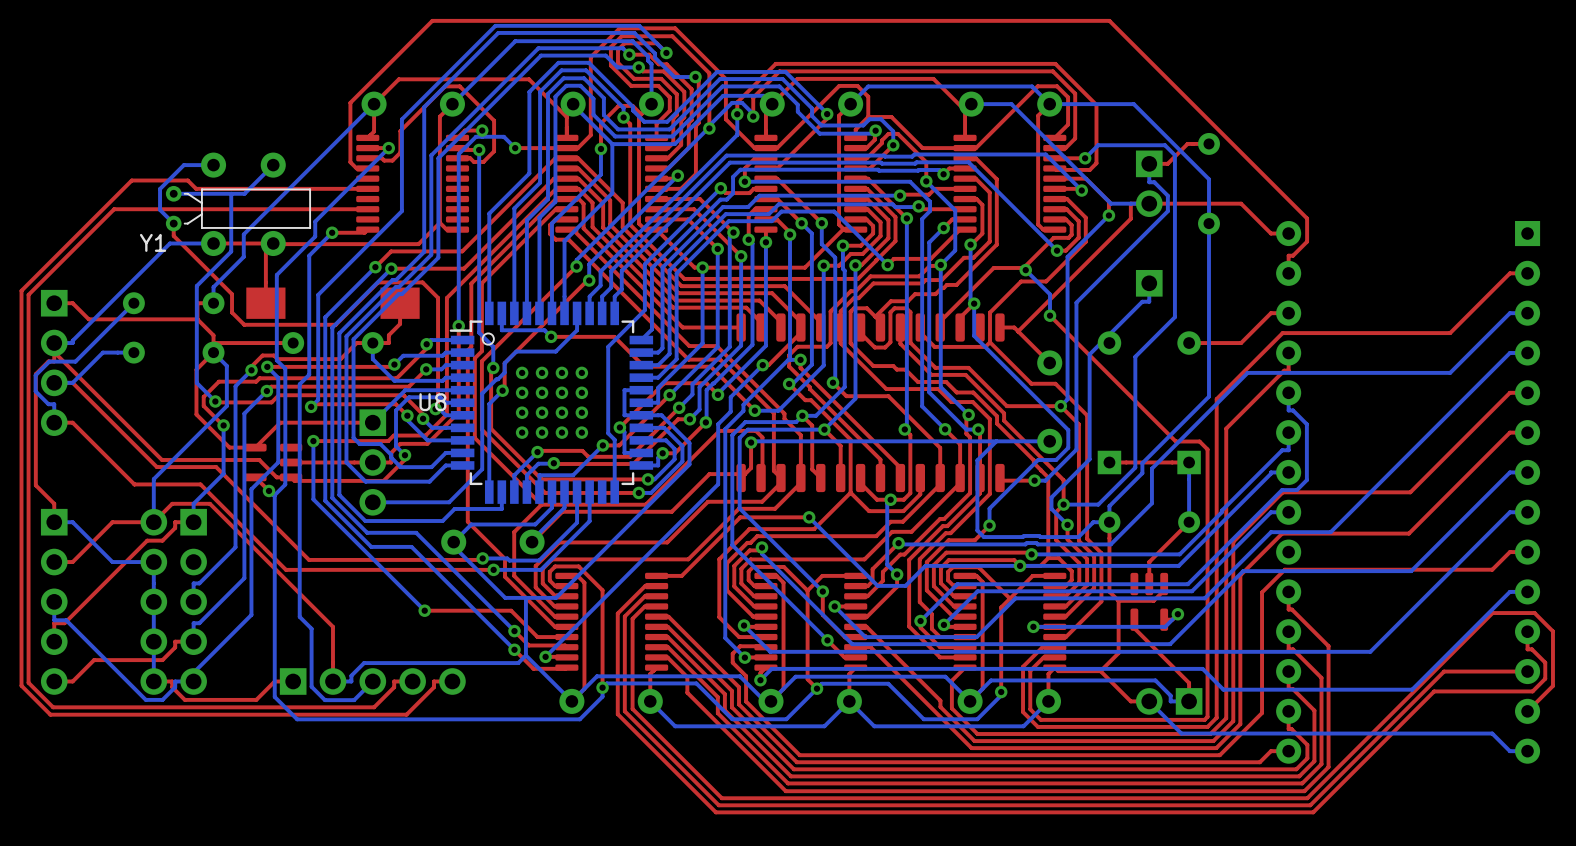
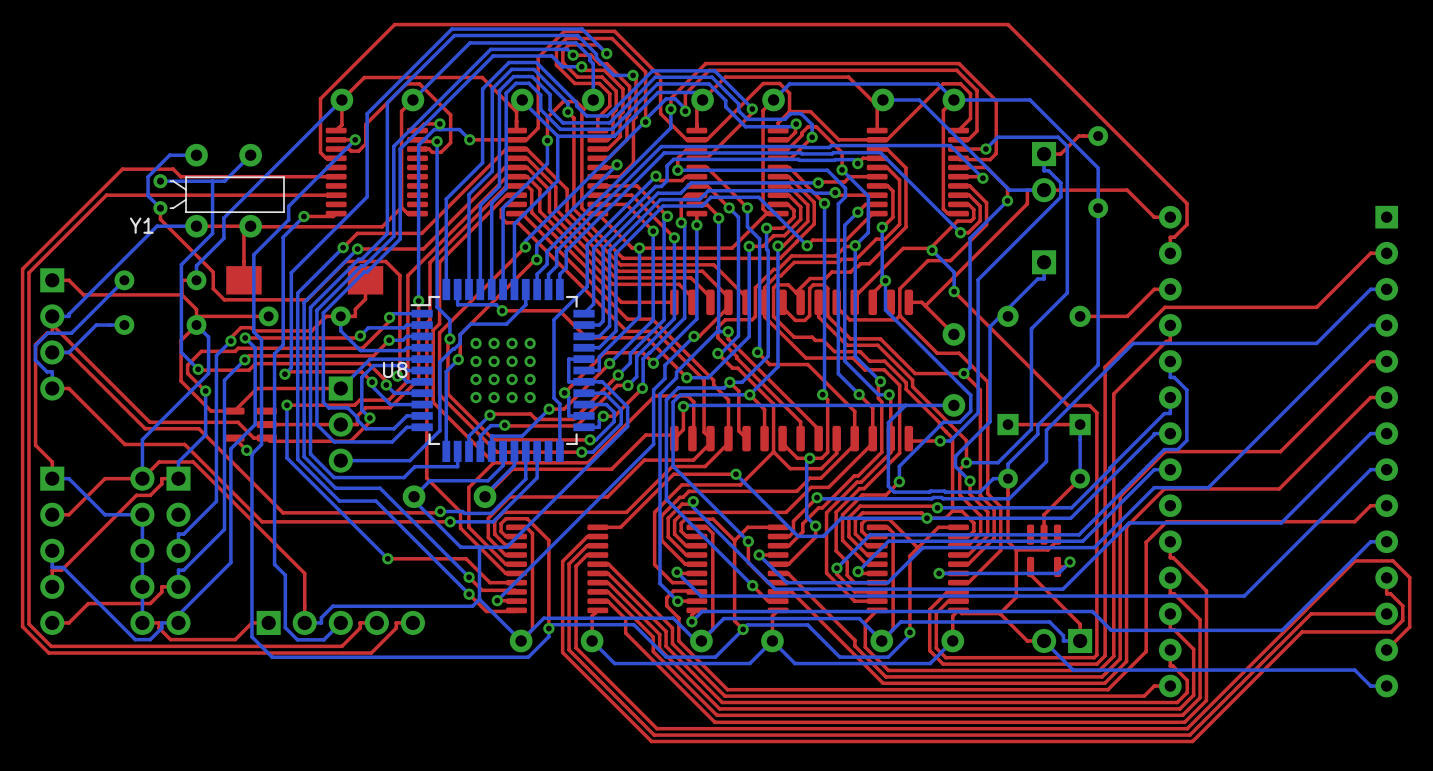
drawing: [481, 332, 495, 346] -> none

